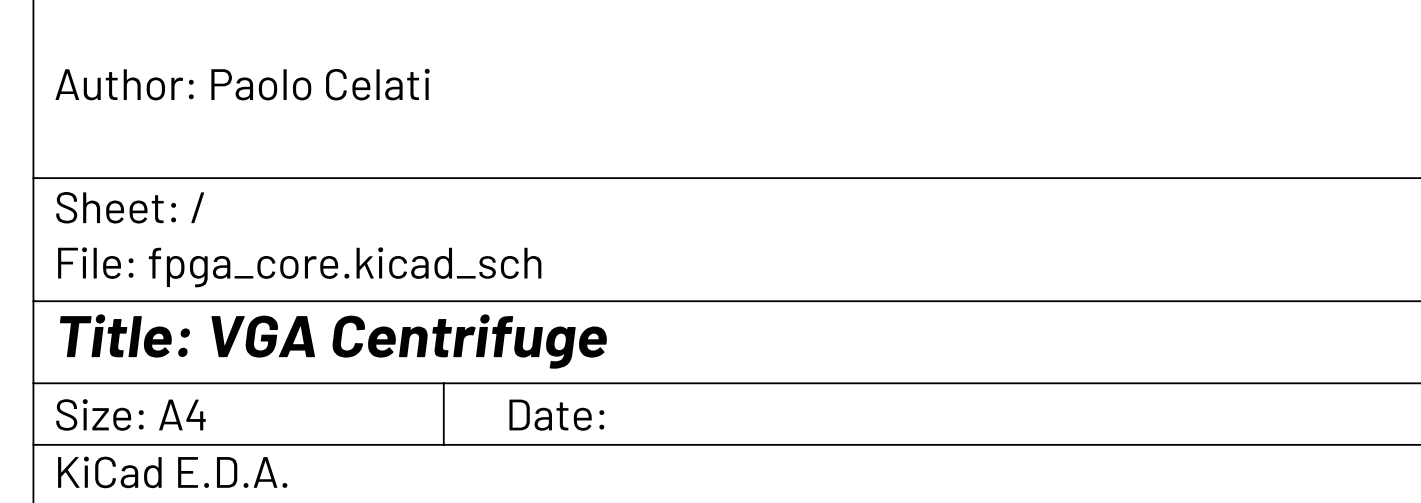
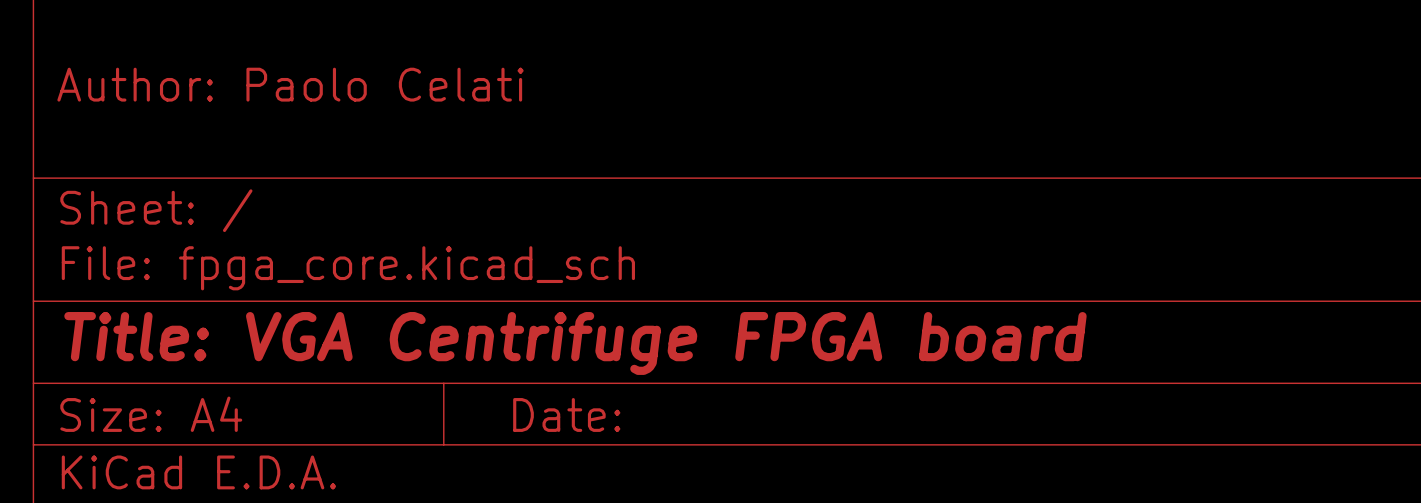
title block: Title: VGA Centrifuge (333, 341) -> Title: VGA Centrifuge FPGA board (575, 343)

